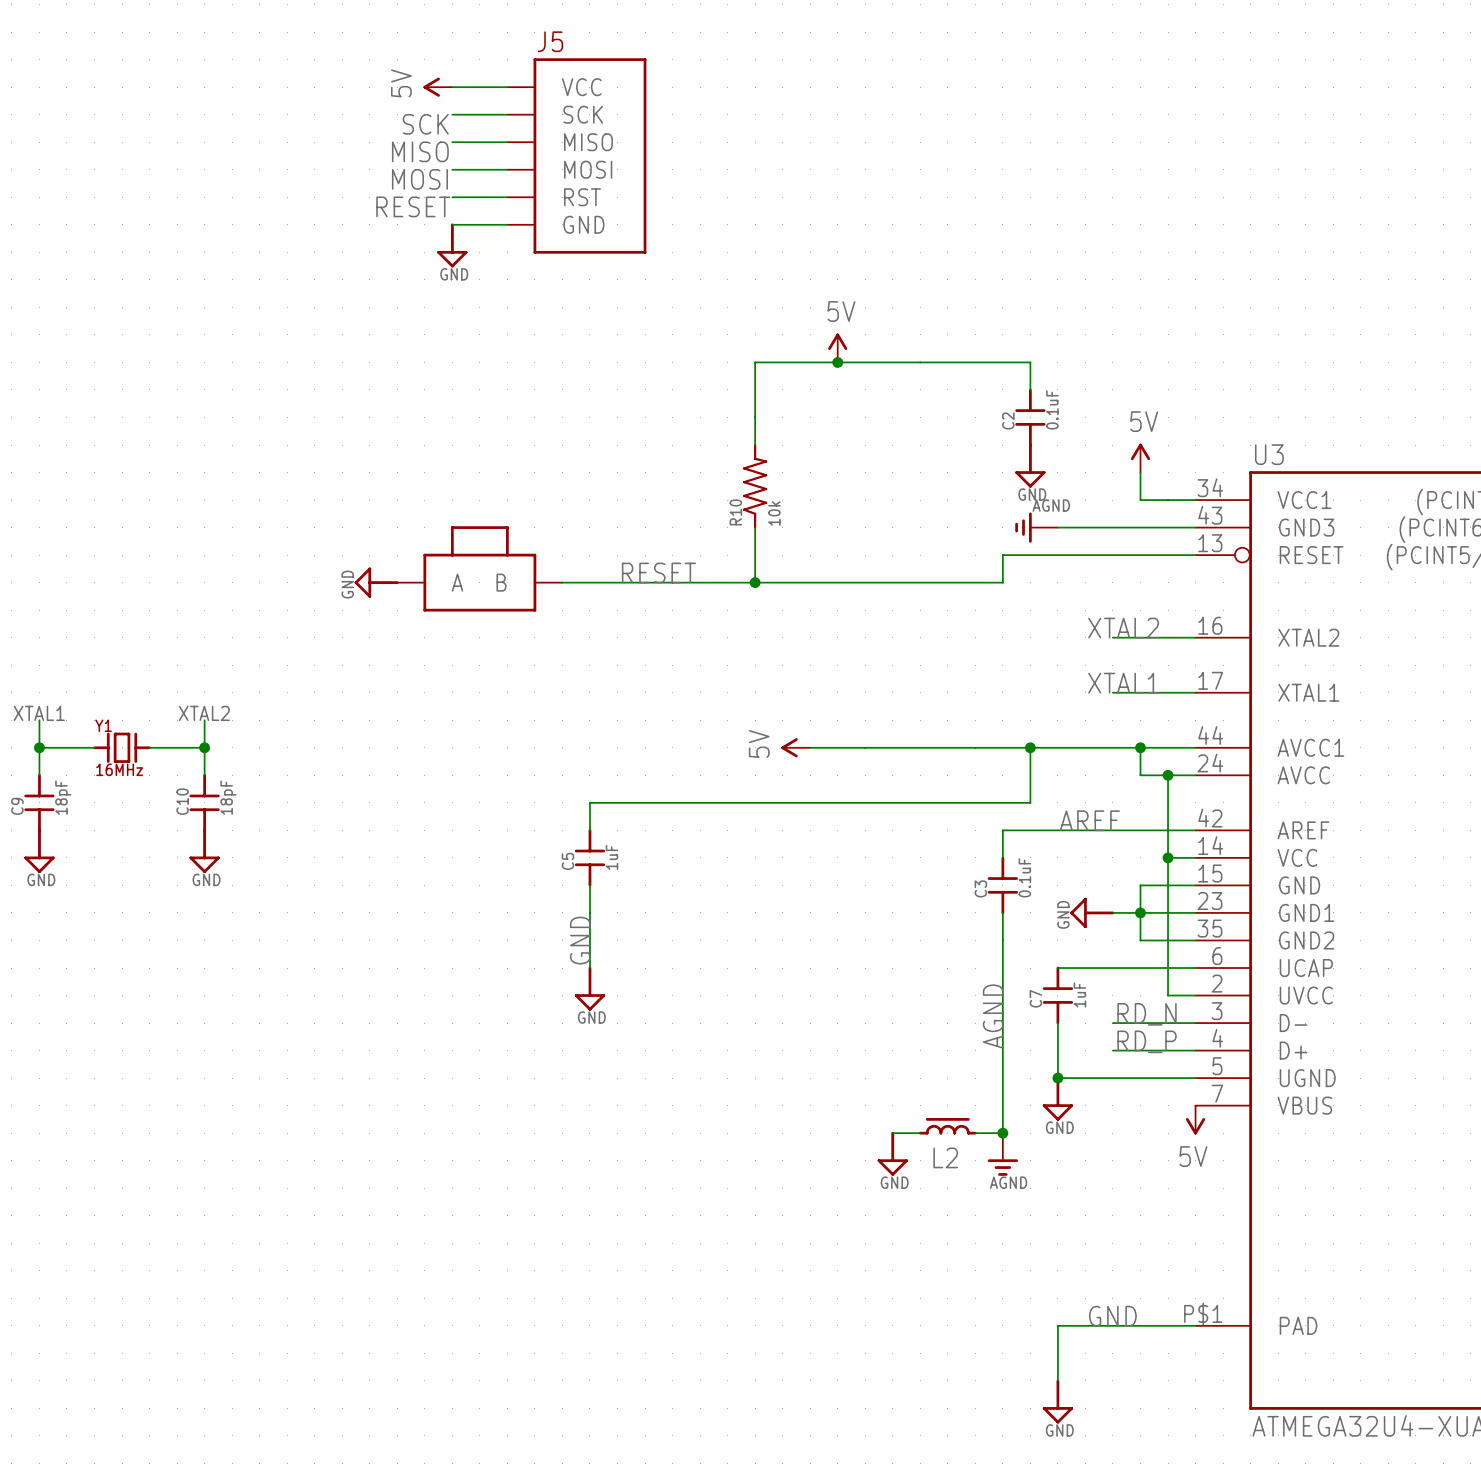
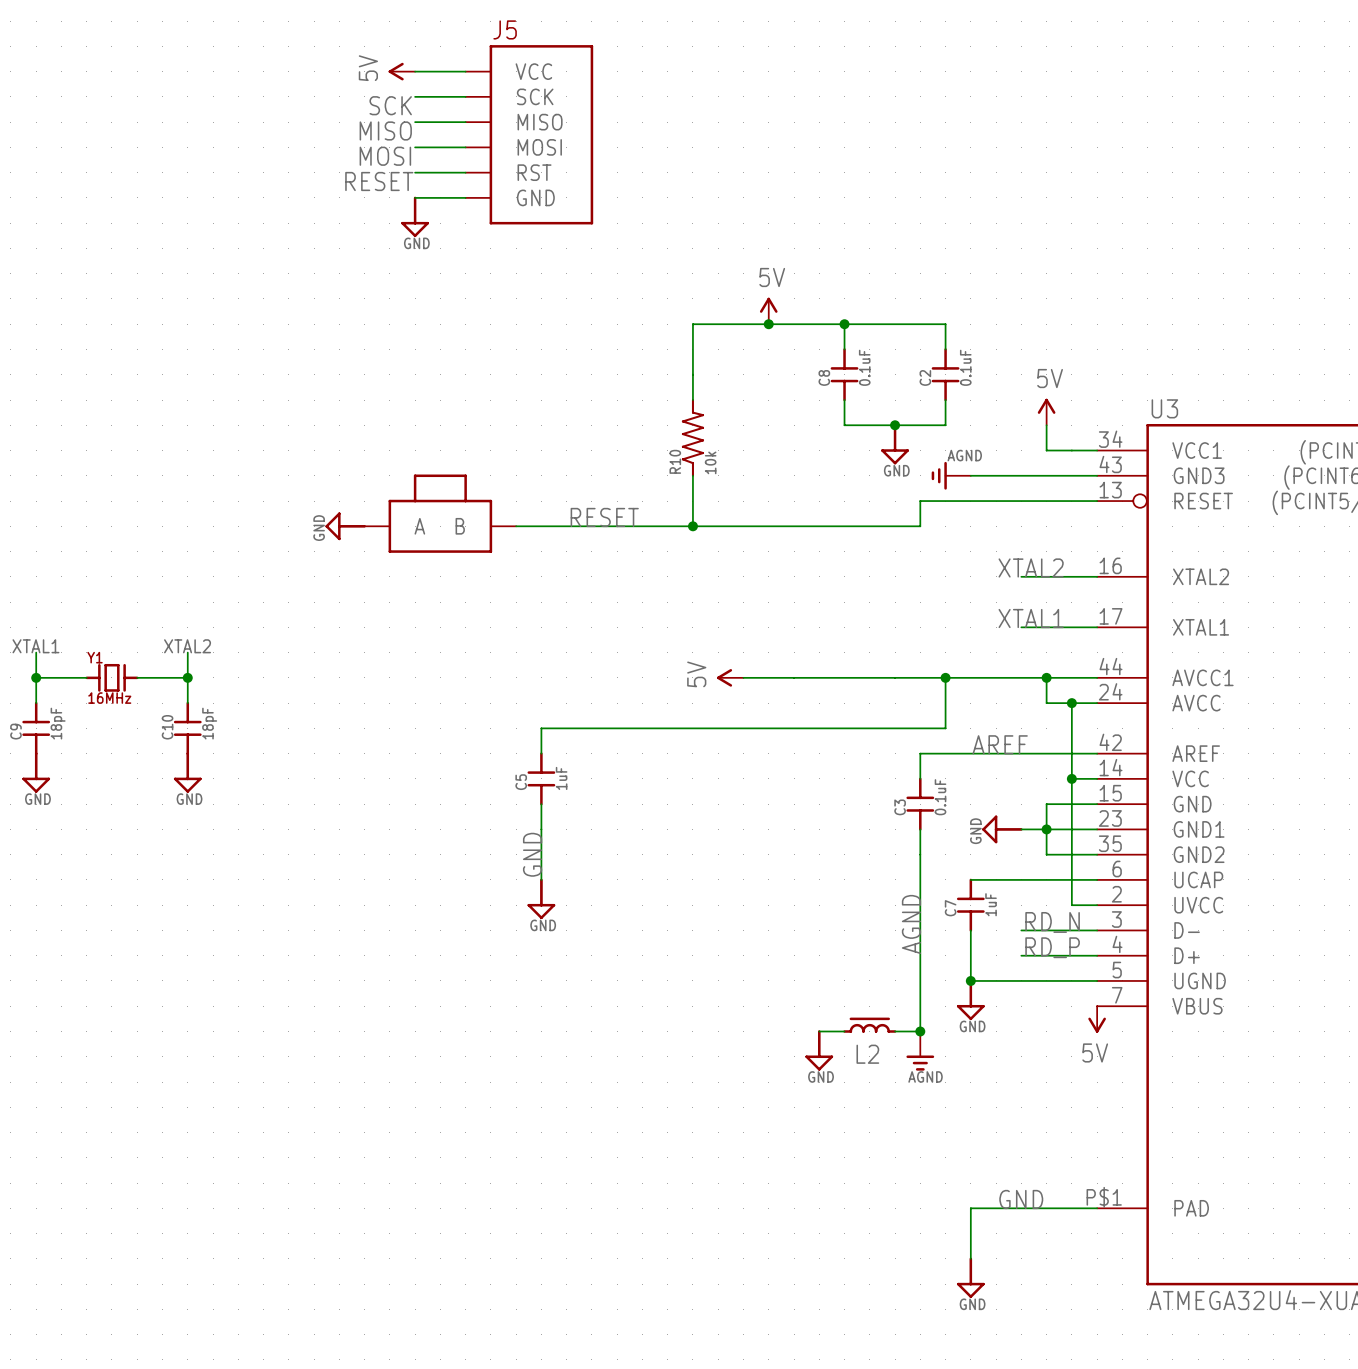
wire: none -> (844, 324) (844, 349)
junction: none -> (844, 324)
C8: none -> 0.1uF (844, 374)
wire: none -> (844, 400) (844, 425) (945, 425) (945, 400)
power symbol position: GND (1030, 465) -> GND (895, 444)
junction: none -> (895, 425)

